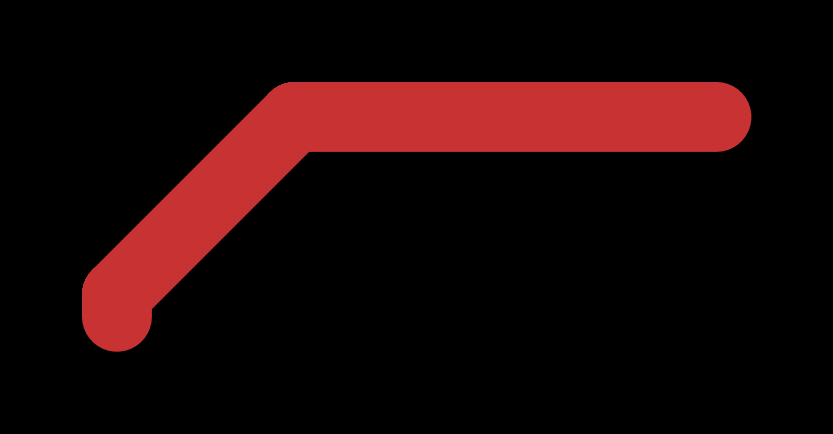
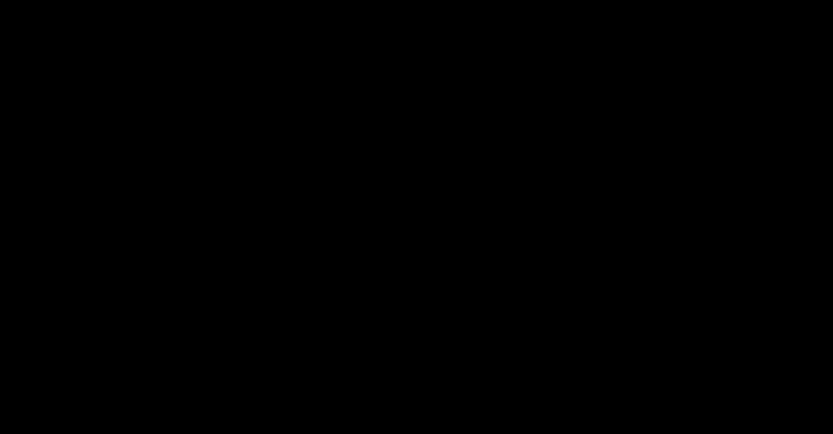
track: (716, 116) (294, 116) (116, 294) (116, 316) -> none

